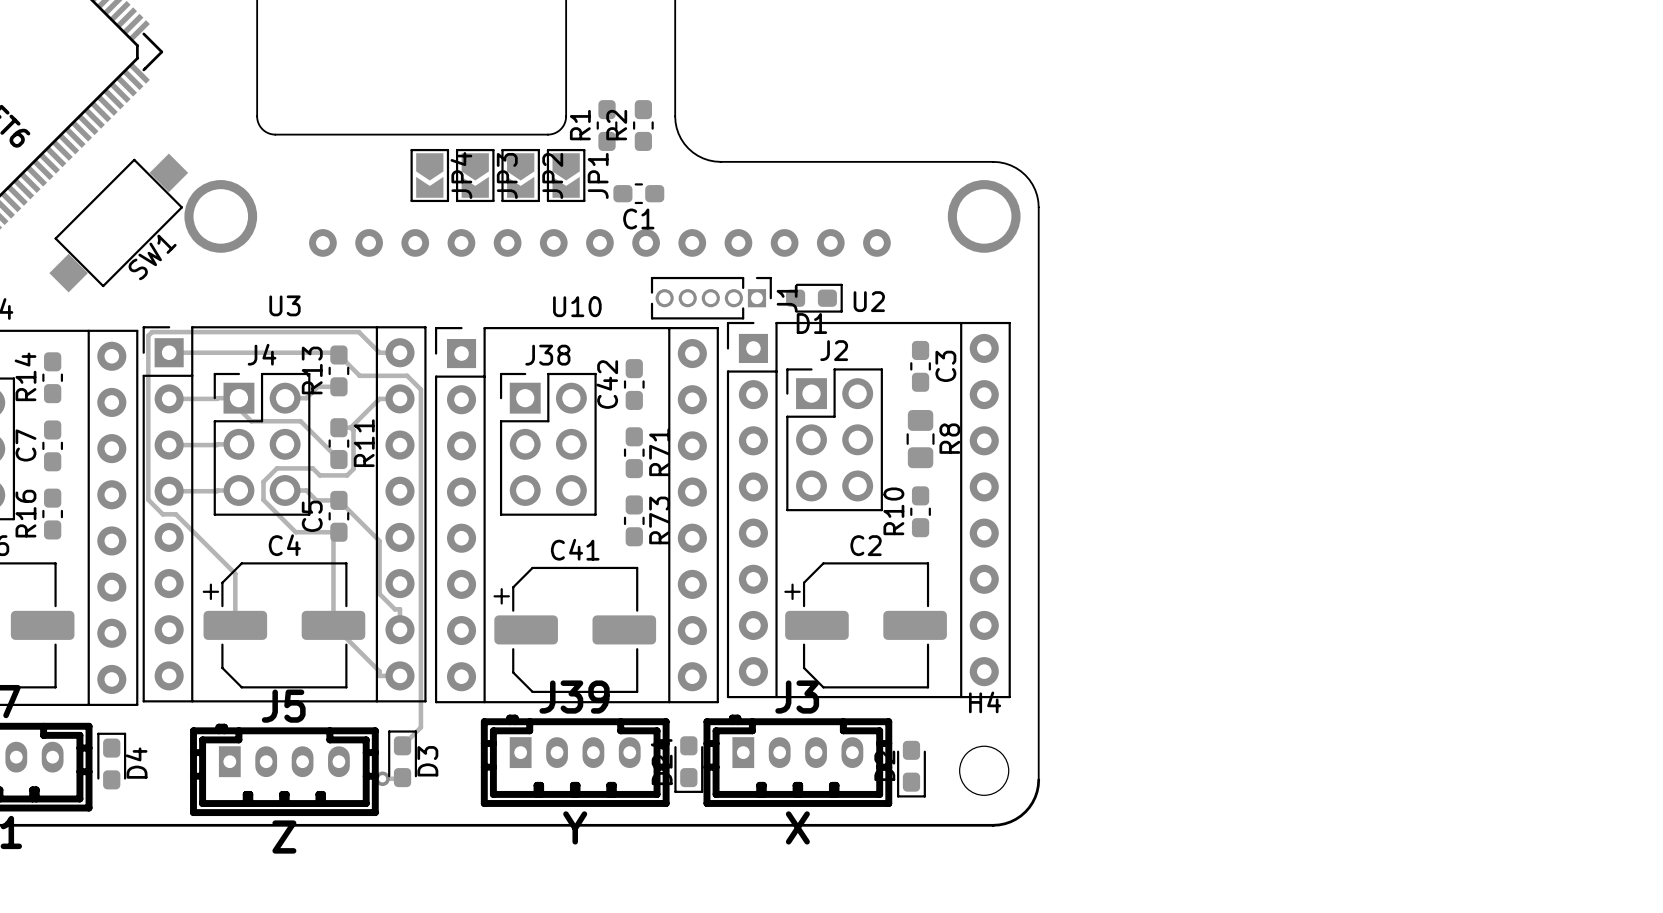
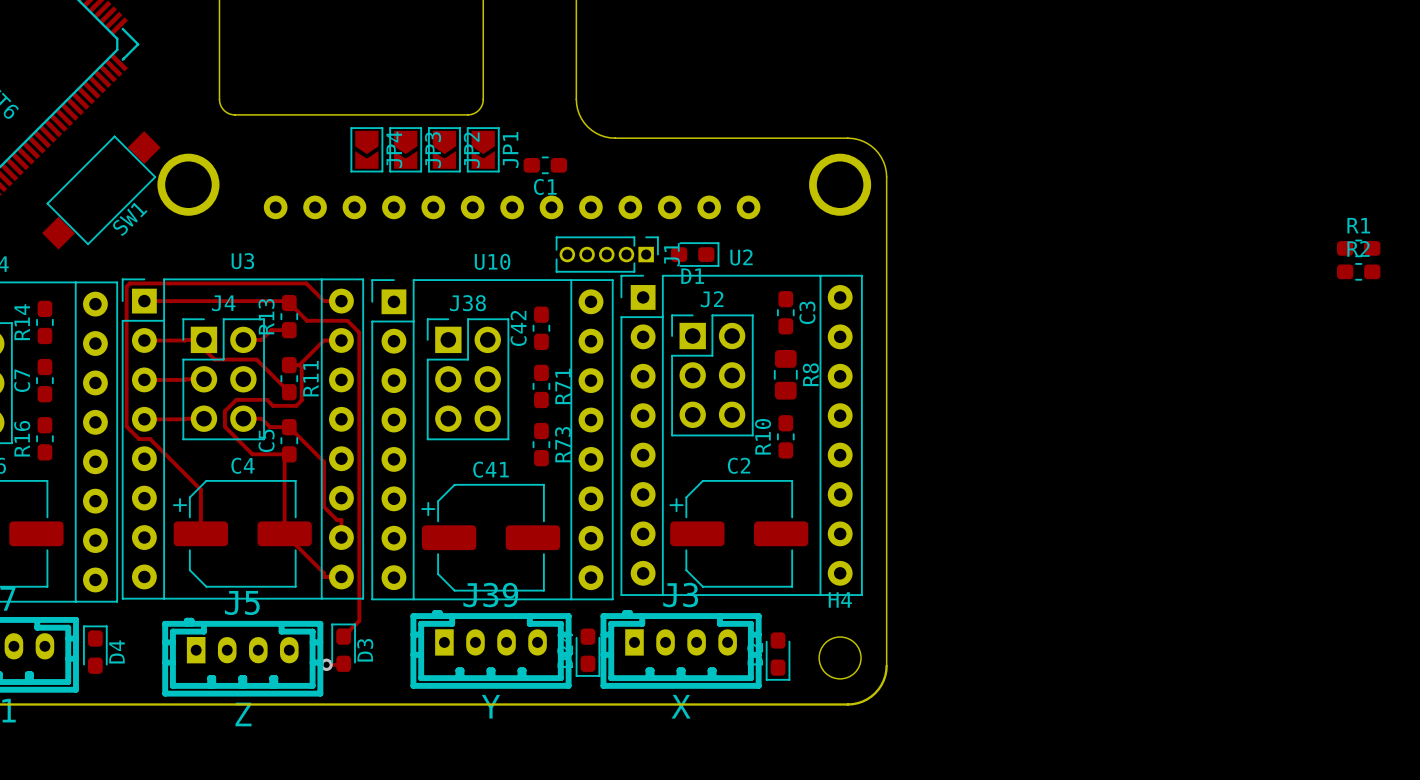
R1 rotation: 0° (607, 125) -> 90° clockwise (1358, 248)
R1 position: (607, 125) -> (1358, 248)
R2 rotation: 0° (643, 125) -> 90° clockwise (1358, 271)
R2 position: (643, 125) -> (1358, 271)

